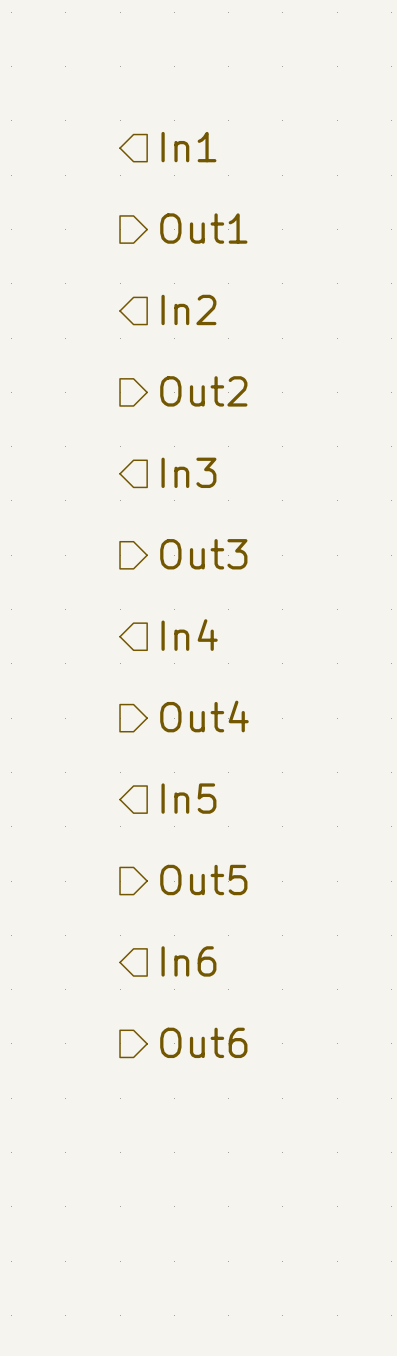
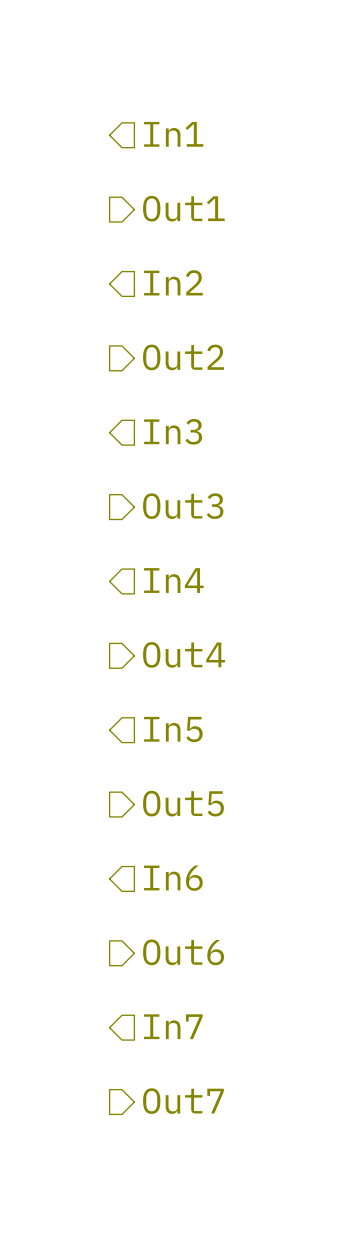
hierarchical label: none -> In7 (173, 1026)
hierarchical label: none -> Out7 (183, 1101)

